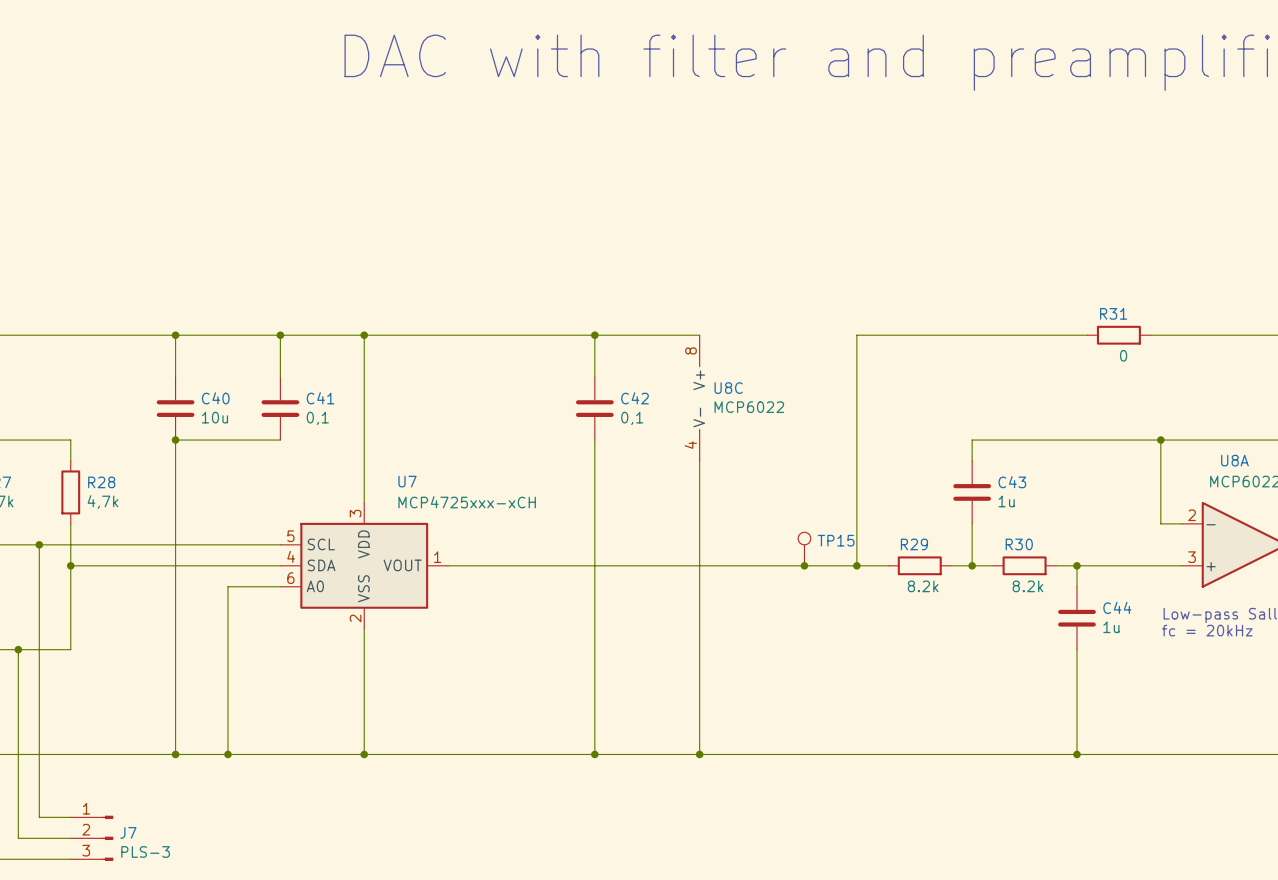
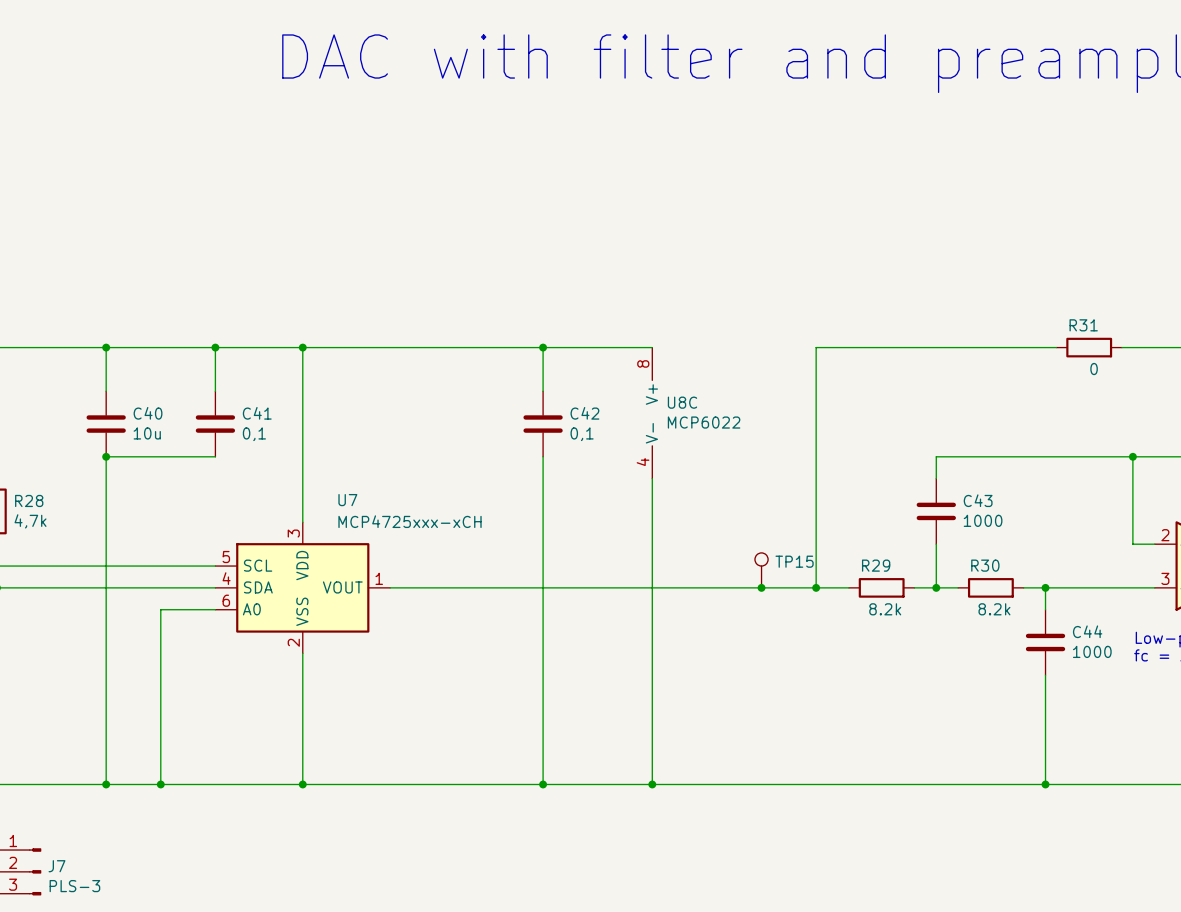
C43 value: 1u (1006, 501) -> 1000 (983, 520)
C44 value: 1u (1111, 627) -> 1000 (1092, 651)

